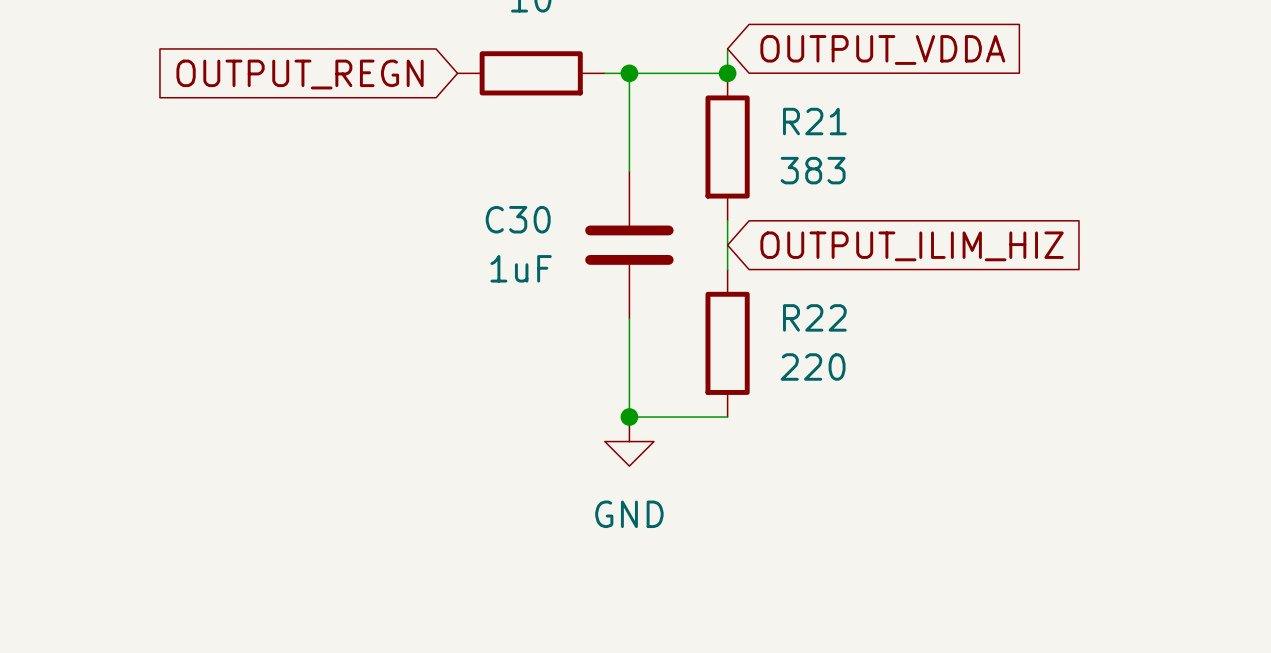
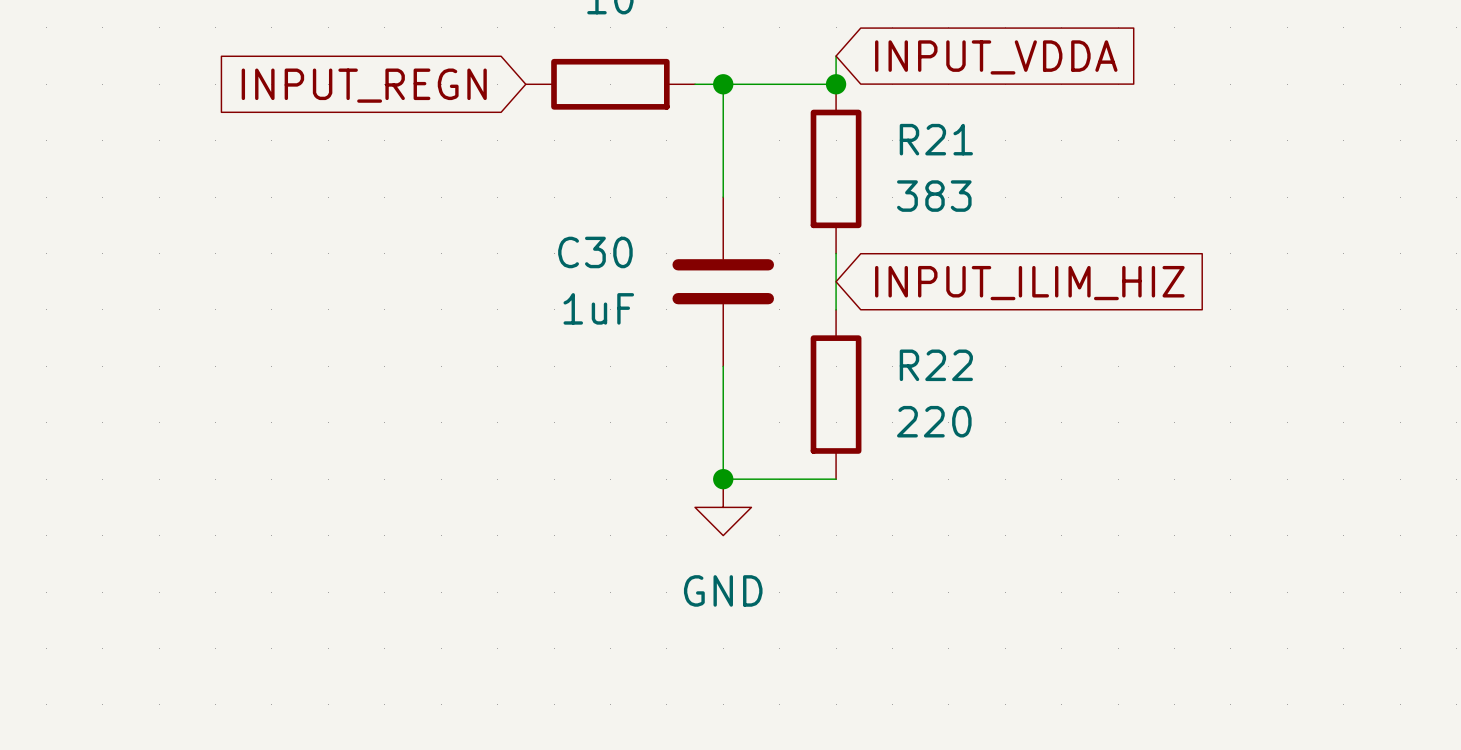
global label: OUTPUT_VDDA (882, 49) -> INPUT_VDDA (996, 57)
global label: OUTPUT_REGN (300, 74) -> INPUT_REGN (364, 85)
global label: OUTPUT_ILIM_HIZ (912, 246) -> INPUT_ILIM_HIZ (1029, 283)

